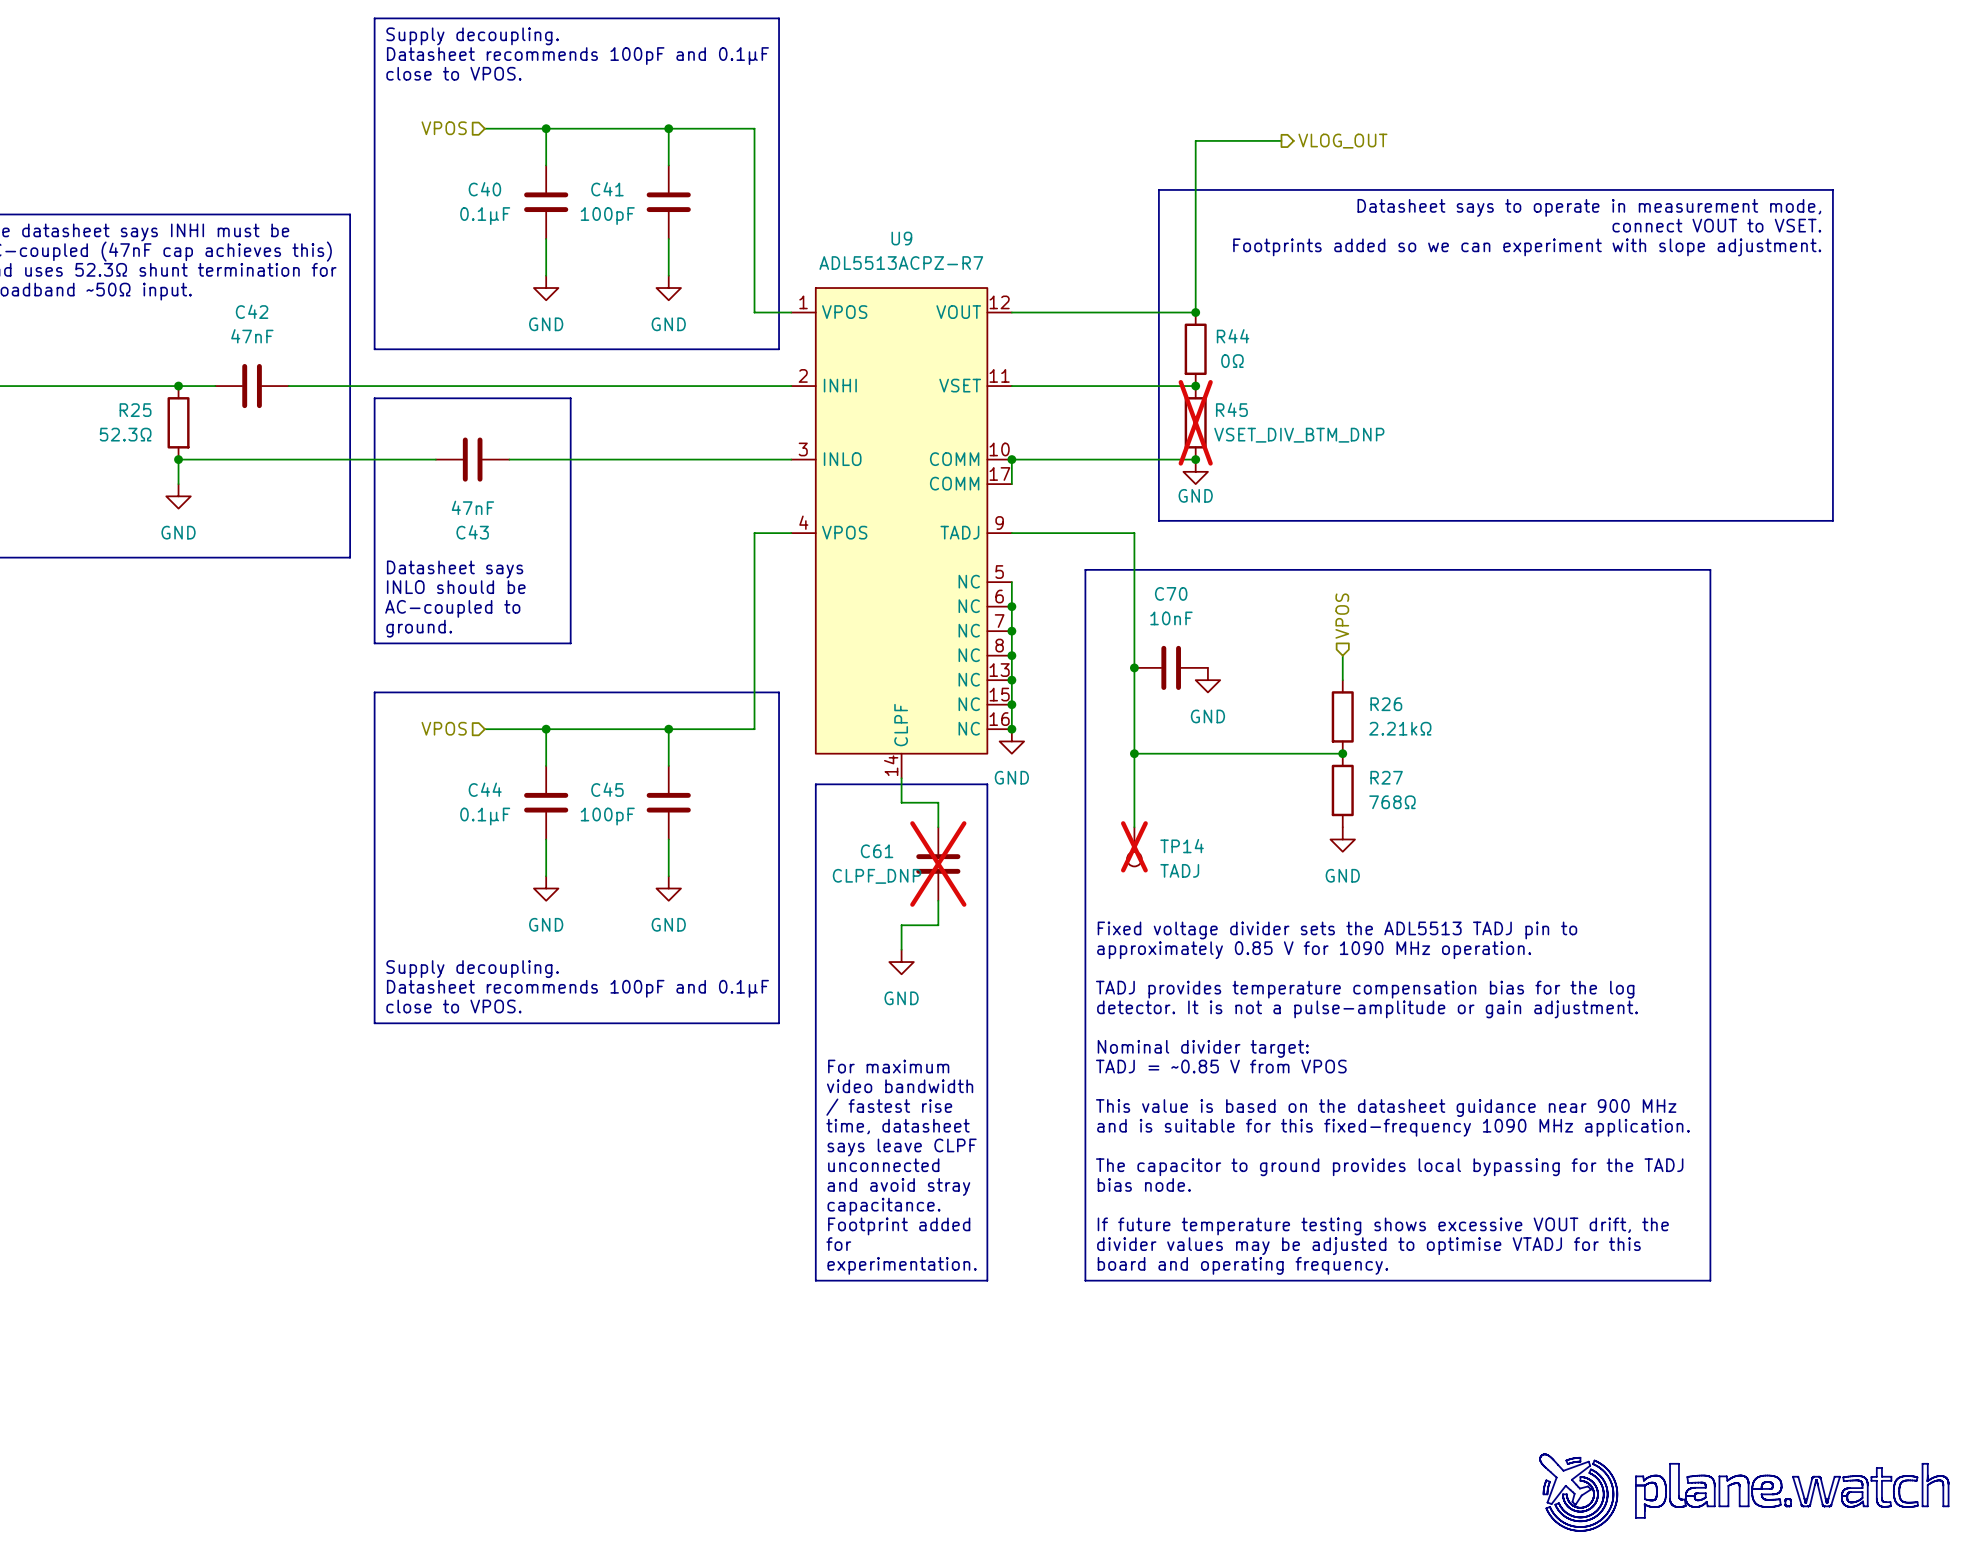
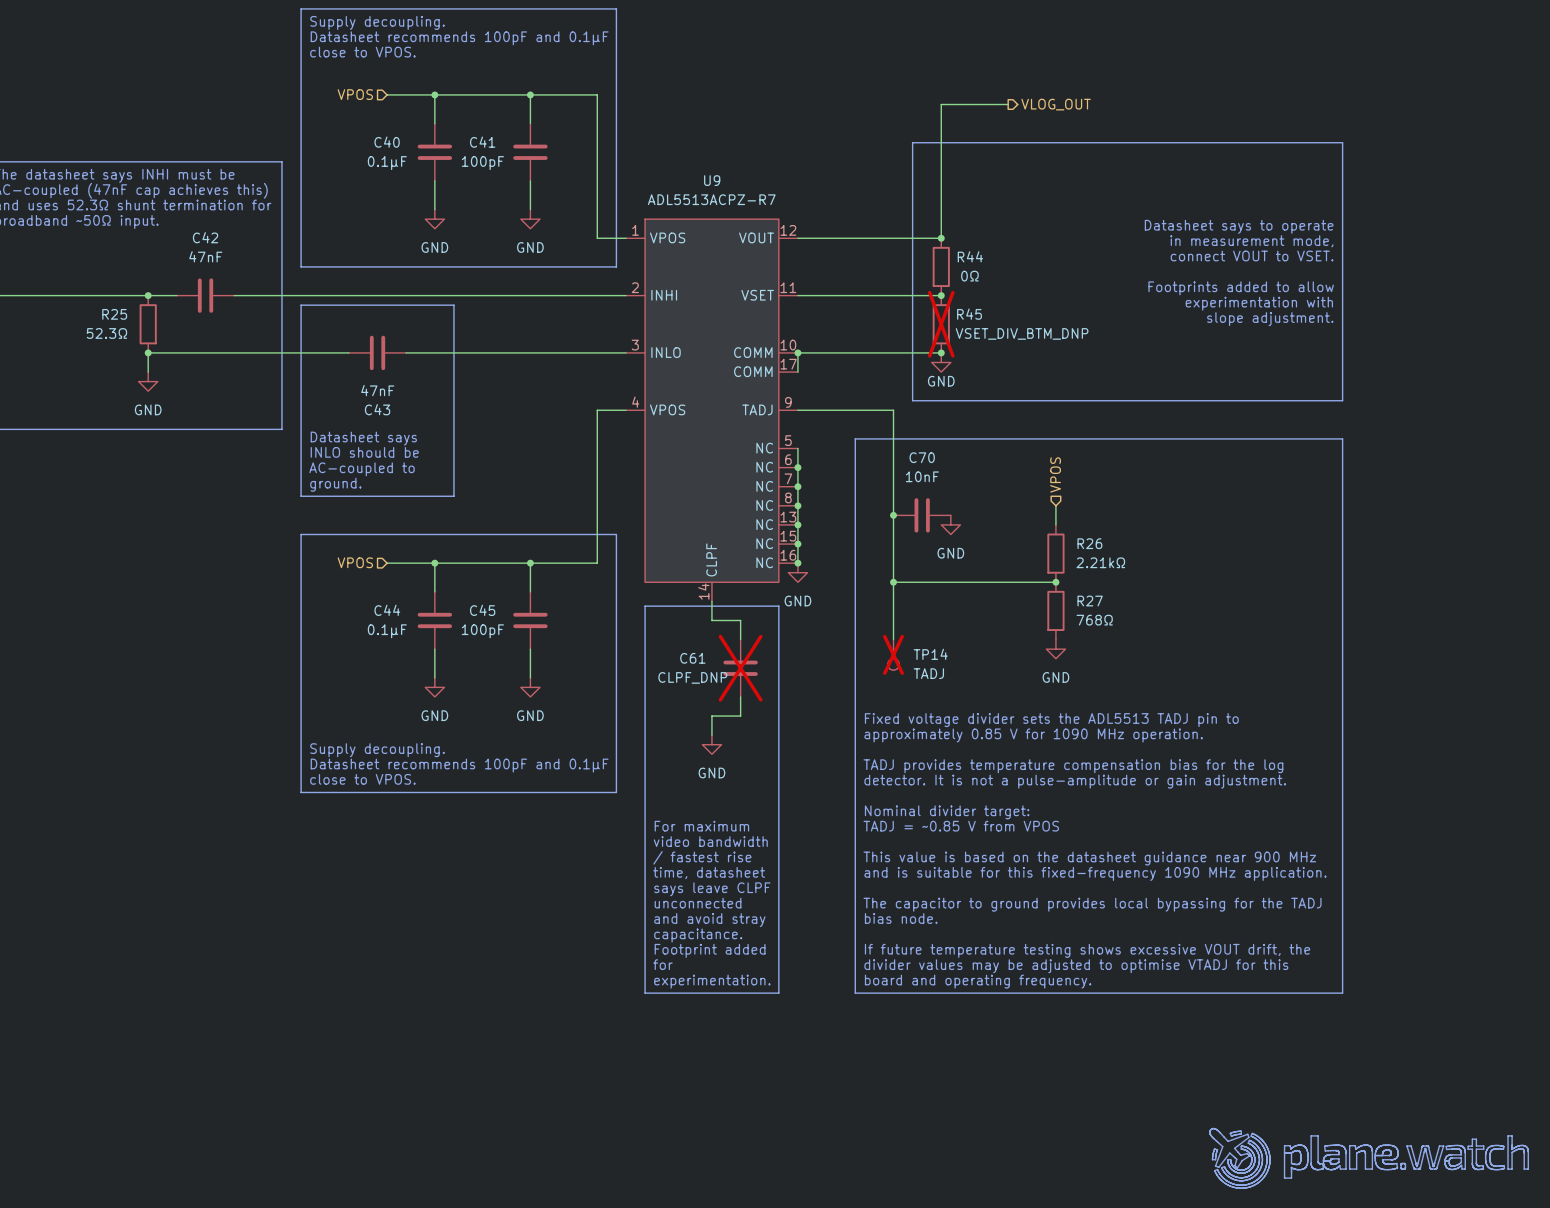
line: (1710, 189) (1832, 189) (1832, 520) (1710, 520) -> (1342, 142) (1342, 400)
text: Datasheet says to operate in measurement mode, (1589, 207) -> none
text position: connect VOUT to VSET. (1716, 225) -> connect VOUT to VSET. (1252, 255)
text: Footprints added so we can experiment with slope adjustment. (1527, 247) -> none
text: none -> Datasheet says to operate (1239, 226)
text: none -> in measurement mode, (1251, 241)
text: none -> Footprints added to allow (1241, 288)
text: none -> experimentation with (1259, 303)
text: none -> slope adjustment. (1270, 319)

